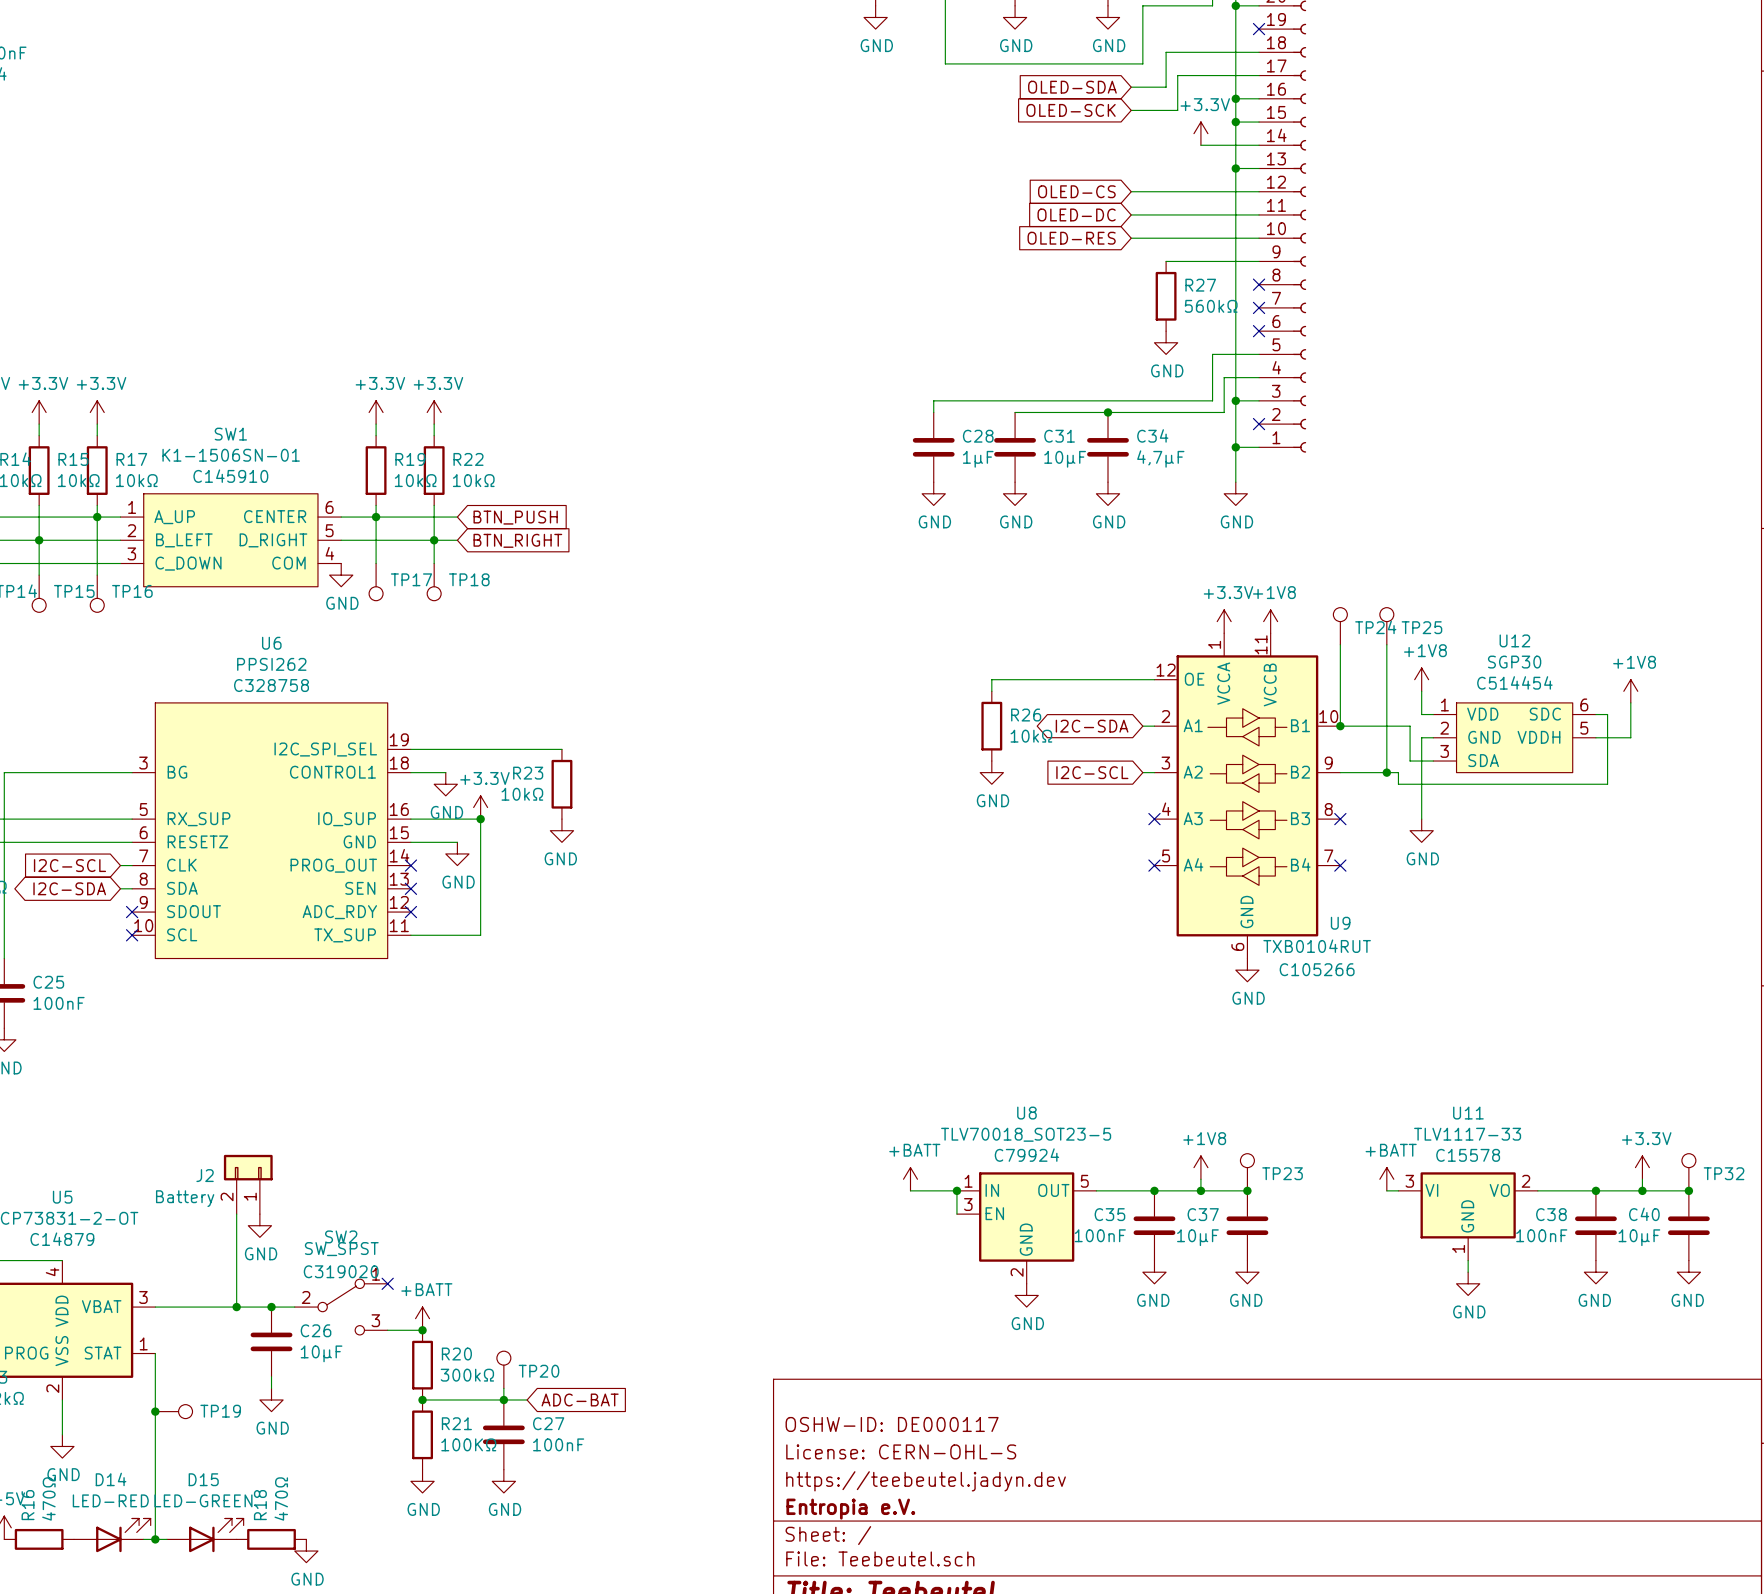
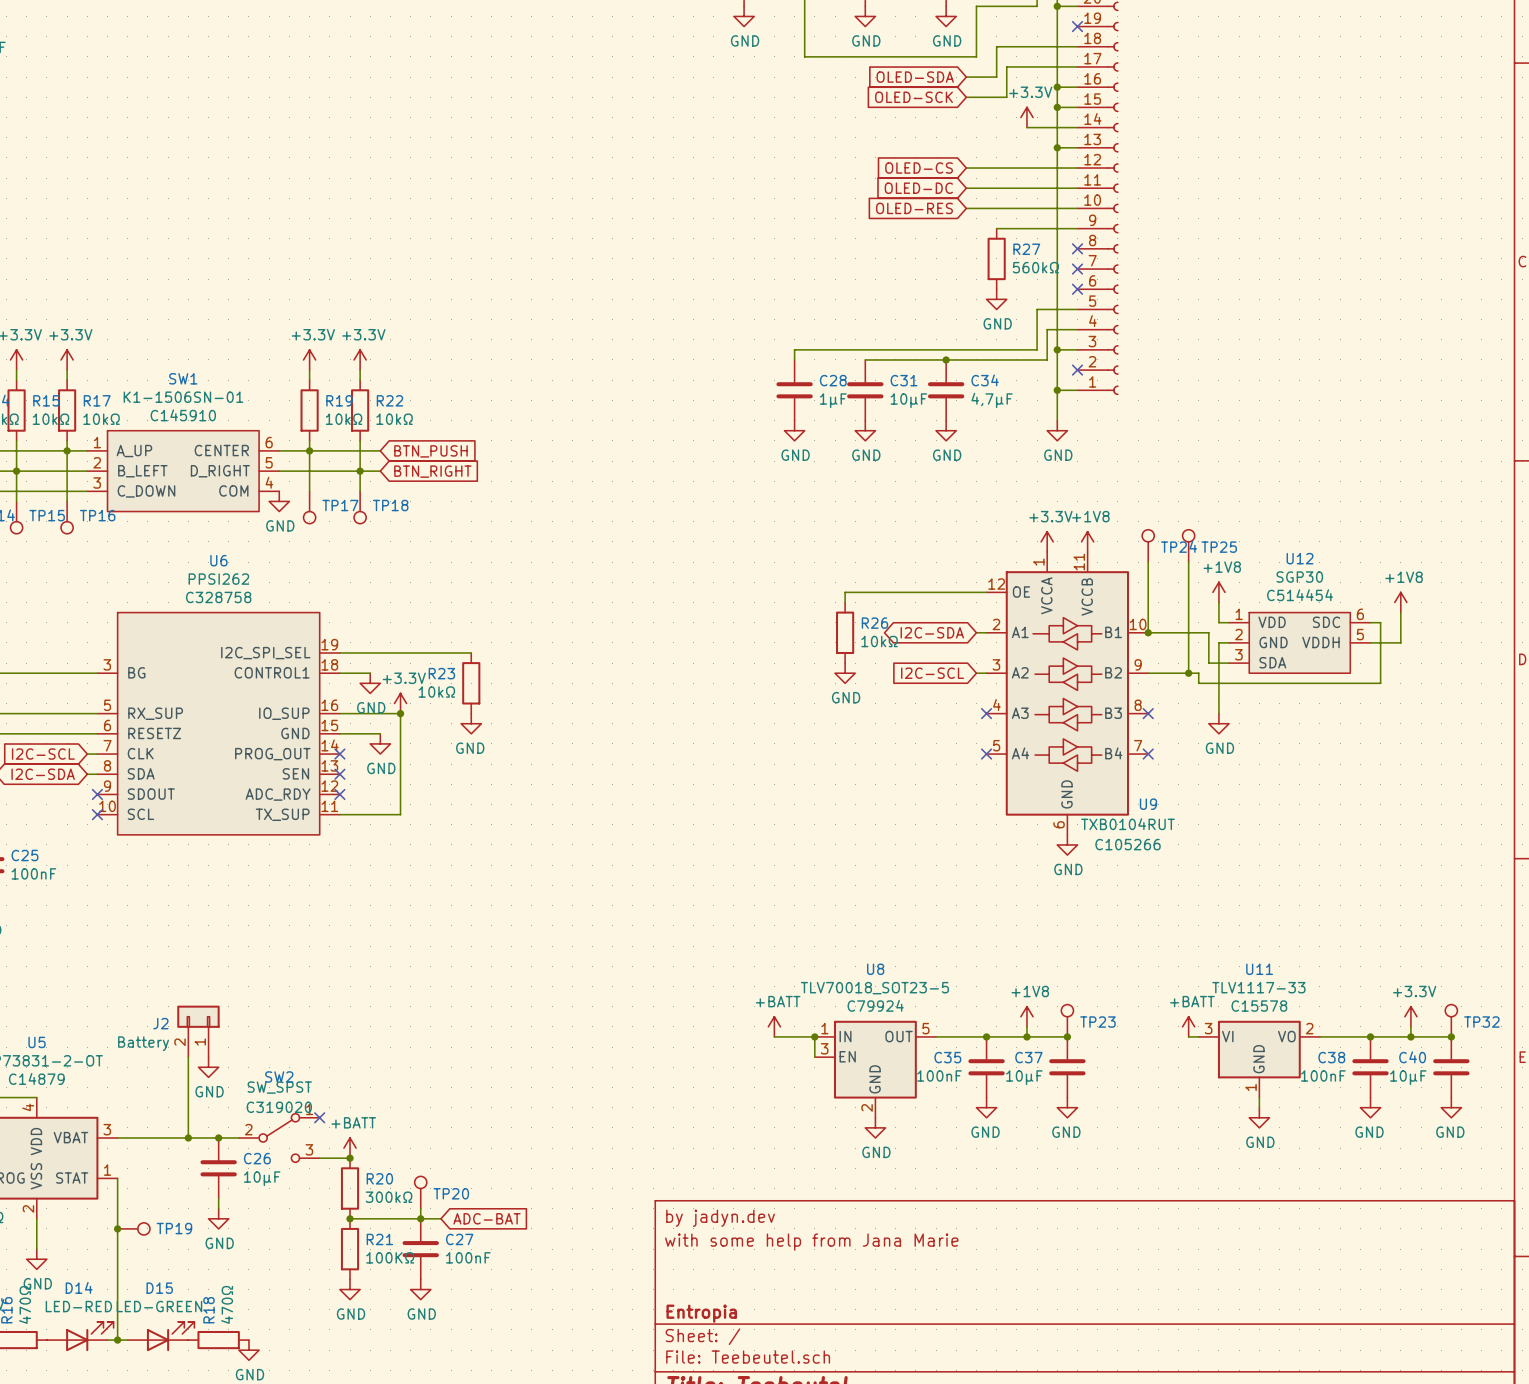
title block: none -> by jadyn.dev (720, 1218)
title block: OSHW-ID: DE000117 (892, 1424) -> with some help from Jana Marie (811, 1242)
title block: License: CERN-OHL-S (901, 1451) -> none
title block: https://teebeutel.jadyn.dev (926, 1481) -> none
title block: Entropia e.V. (850, 1509) -> Entropia (701, 1313)

